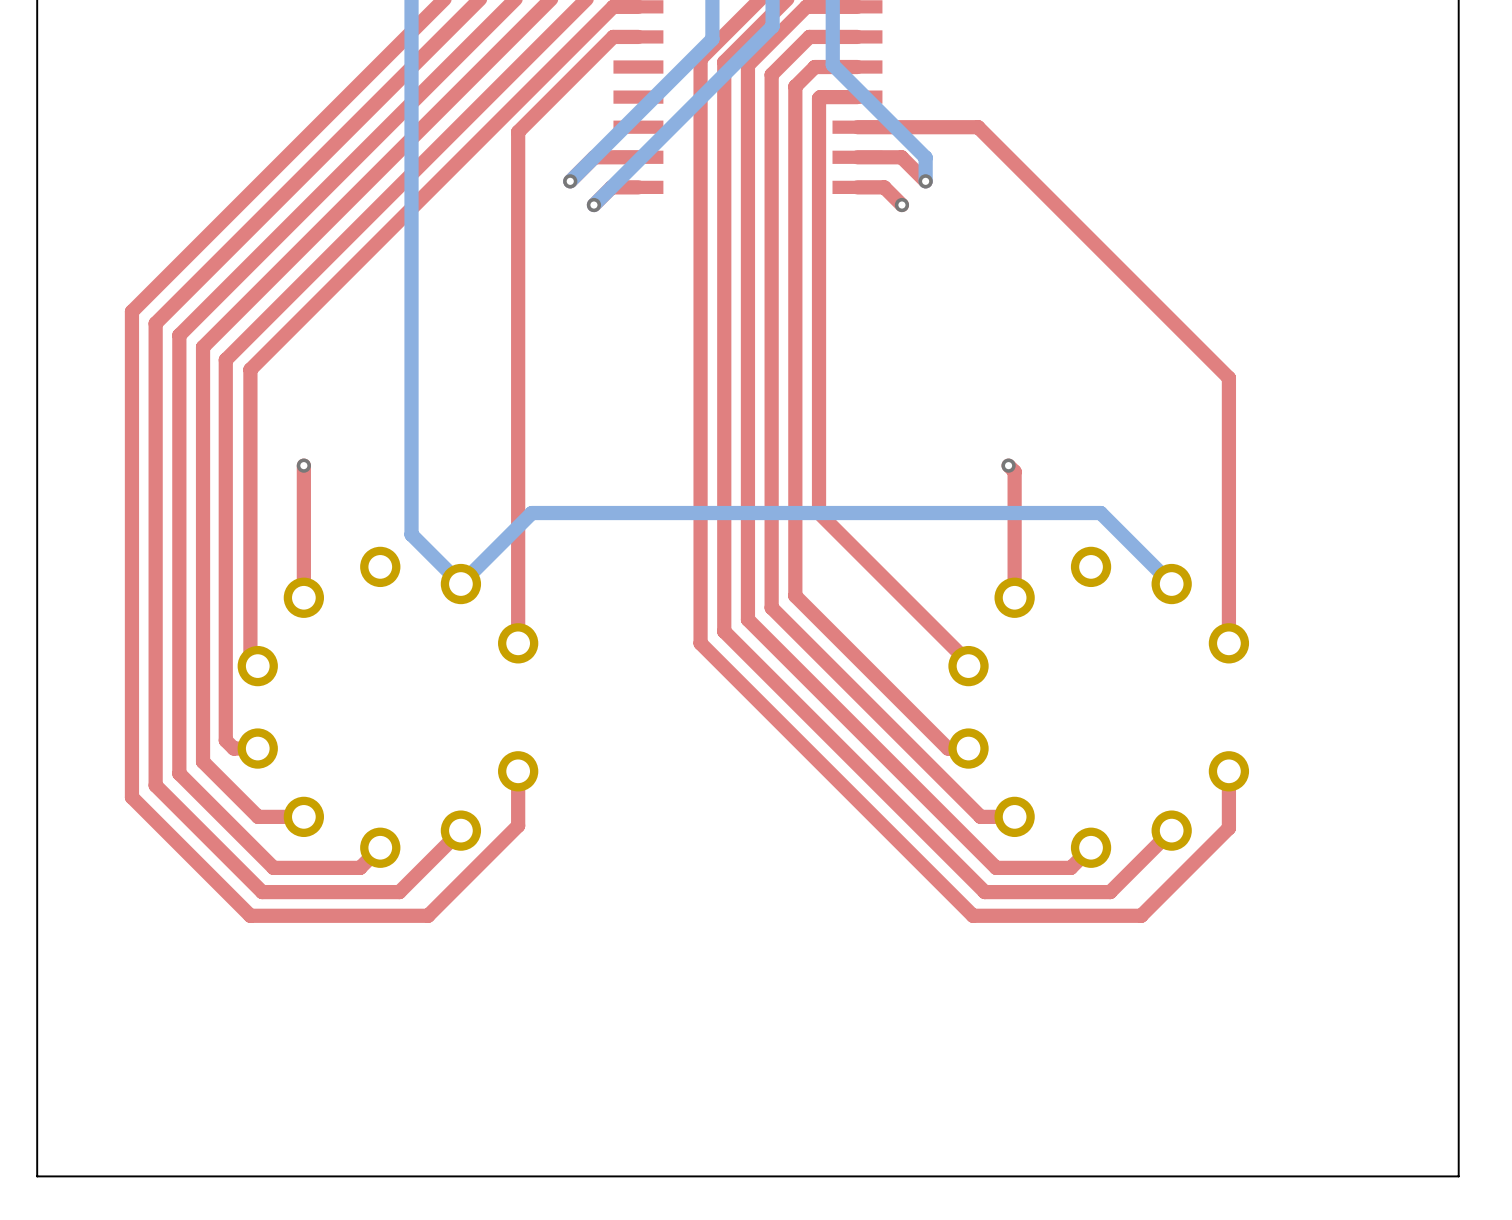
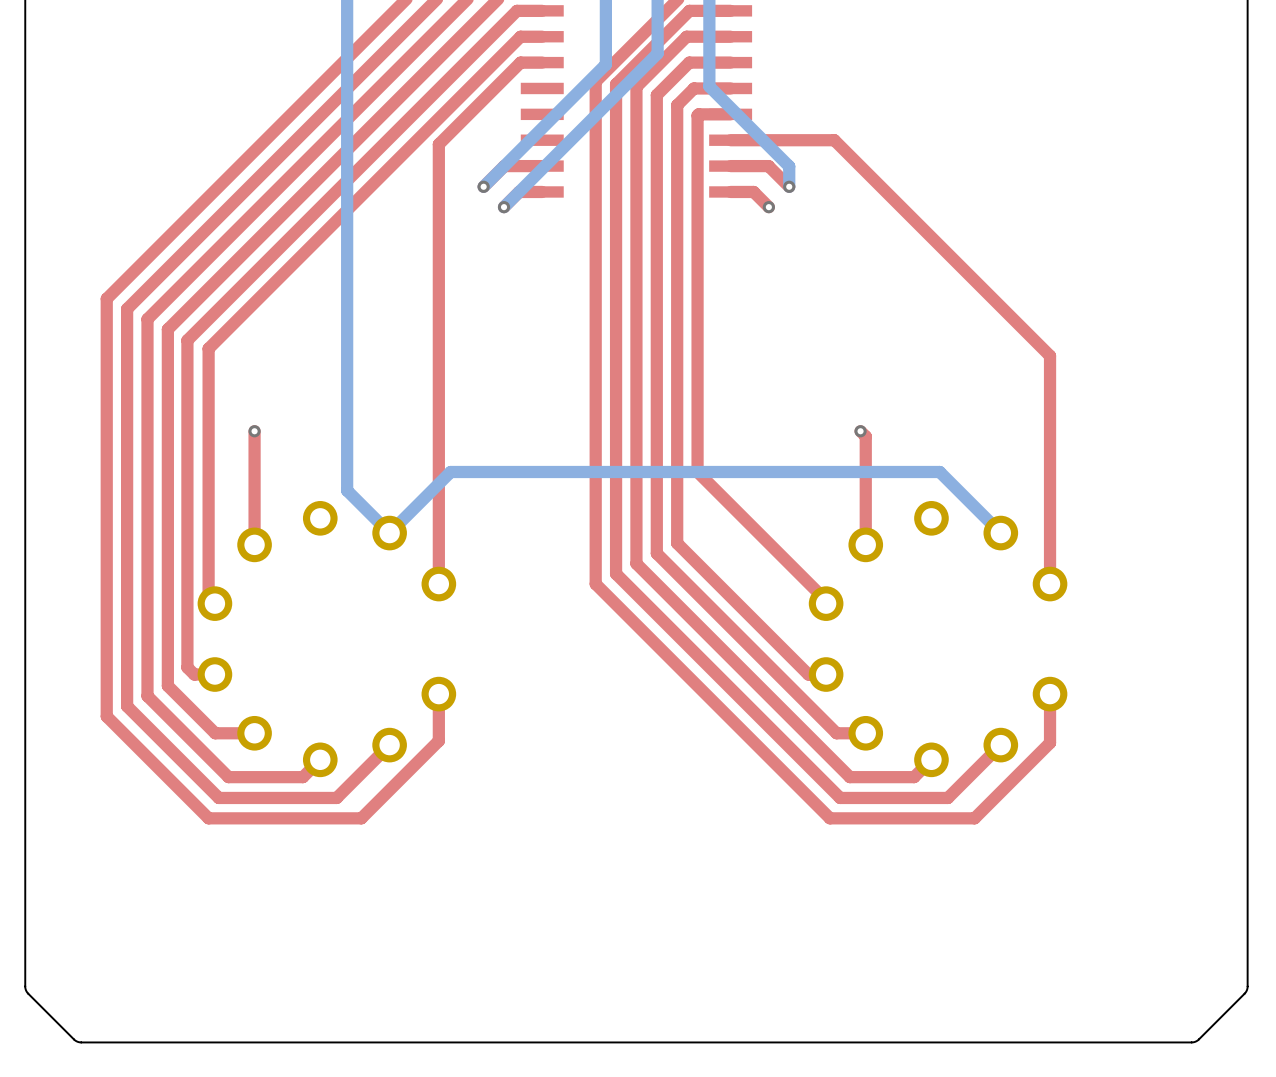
board edge: (37, 1111) (37, 1176) (102, 1176) -> (25, 986) (28, 993) (74, 1039) (81, 1042)
board edge: (1458, 1111) (1458, 1176) (1393, 1176) -> (1247, 986) (1244, 993) (1198, 1039) (1191, 1042)

